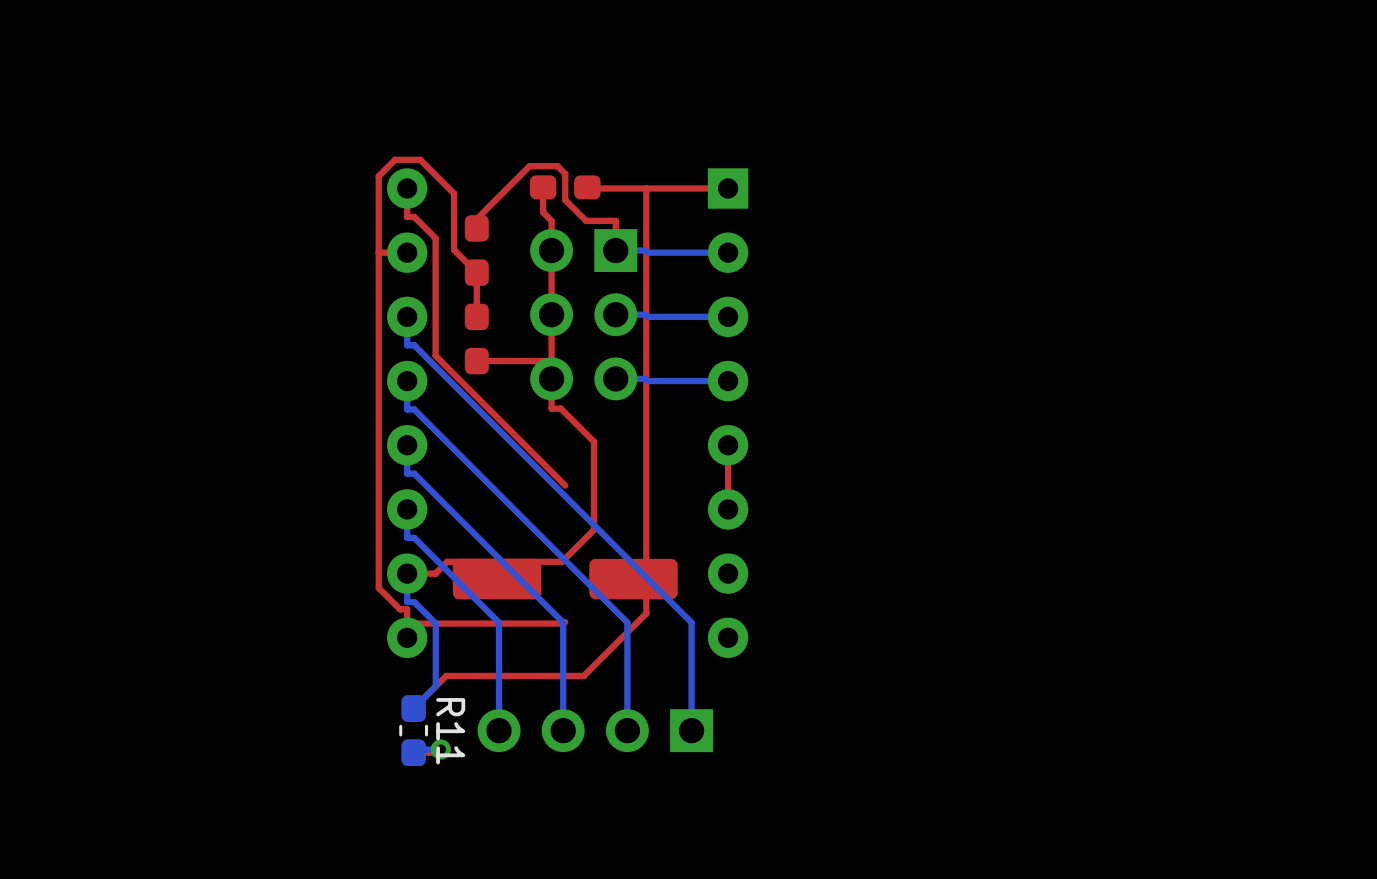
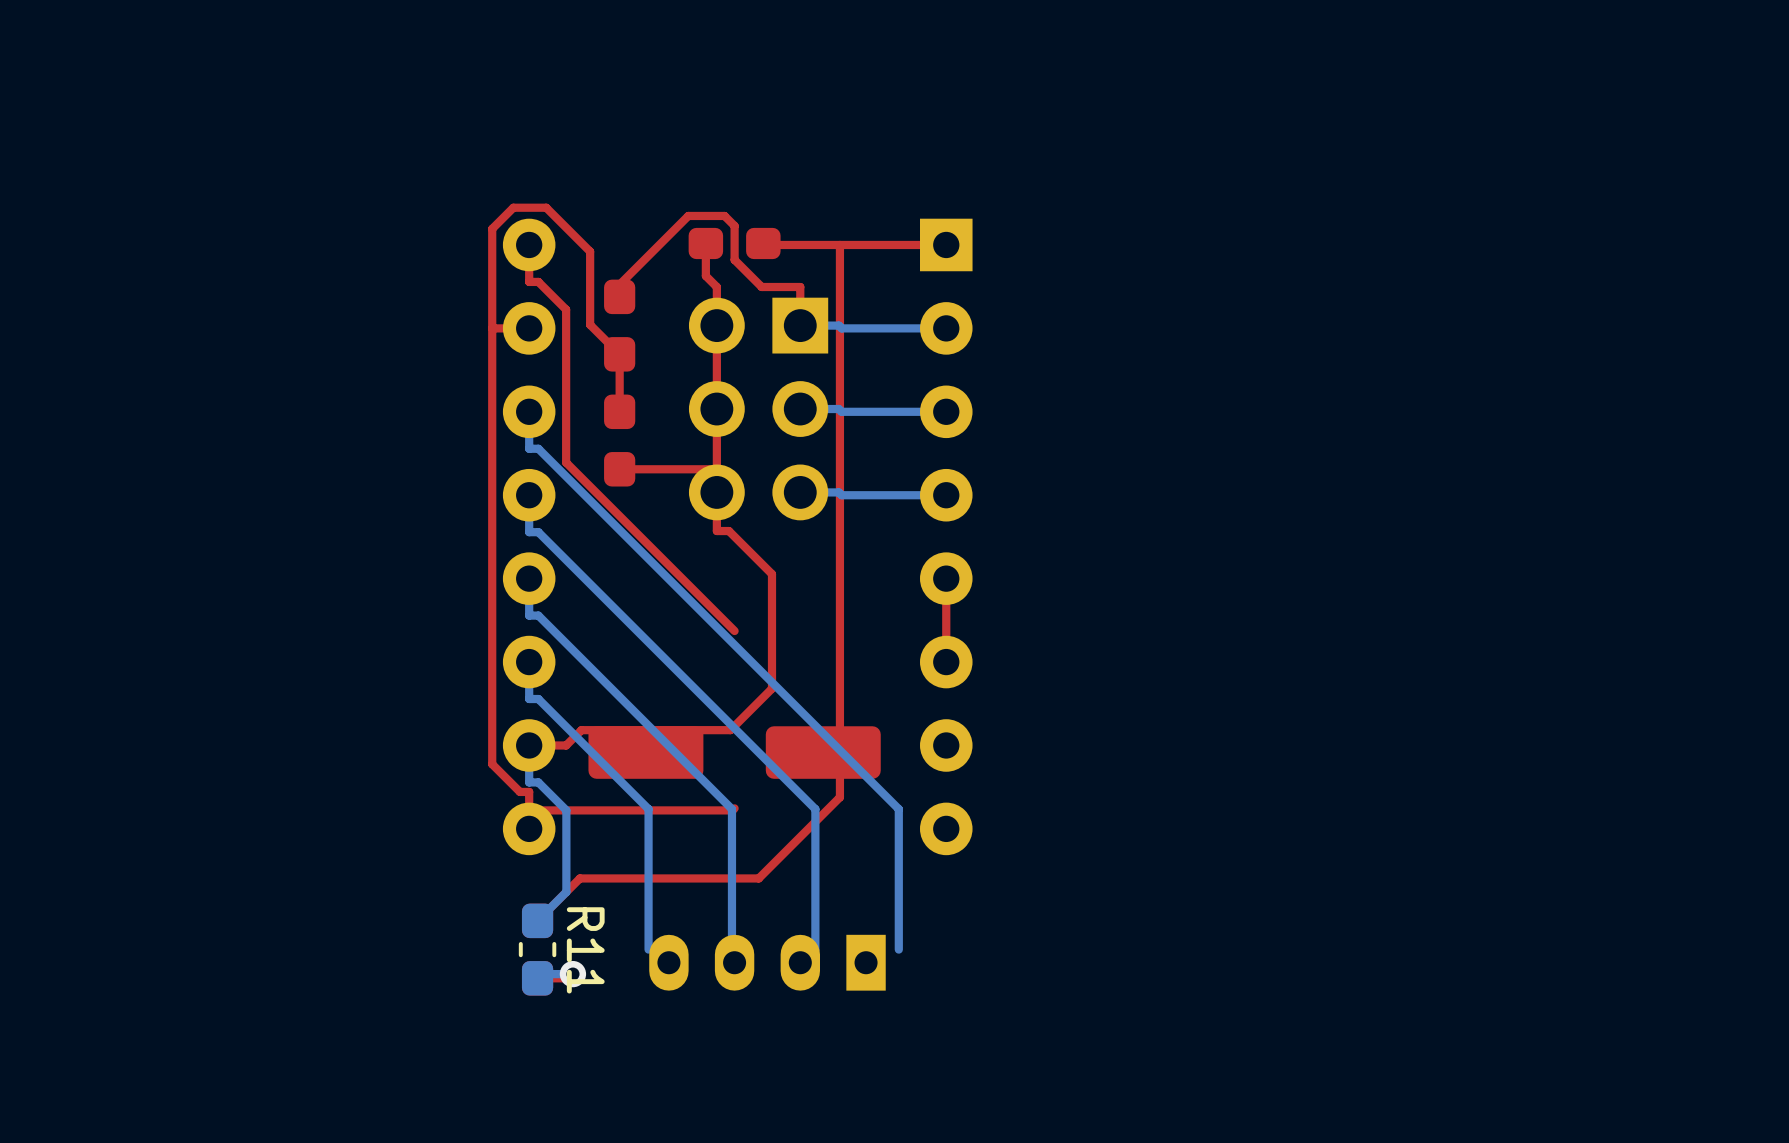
part footprint: [477, 709, 714, 753] -> [649, 934, 886, 991]

